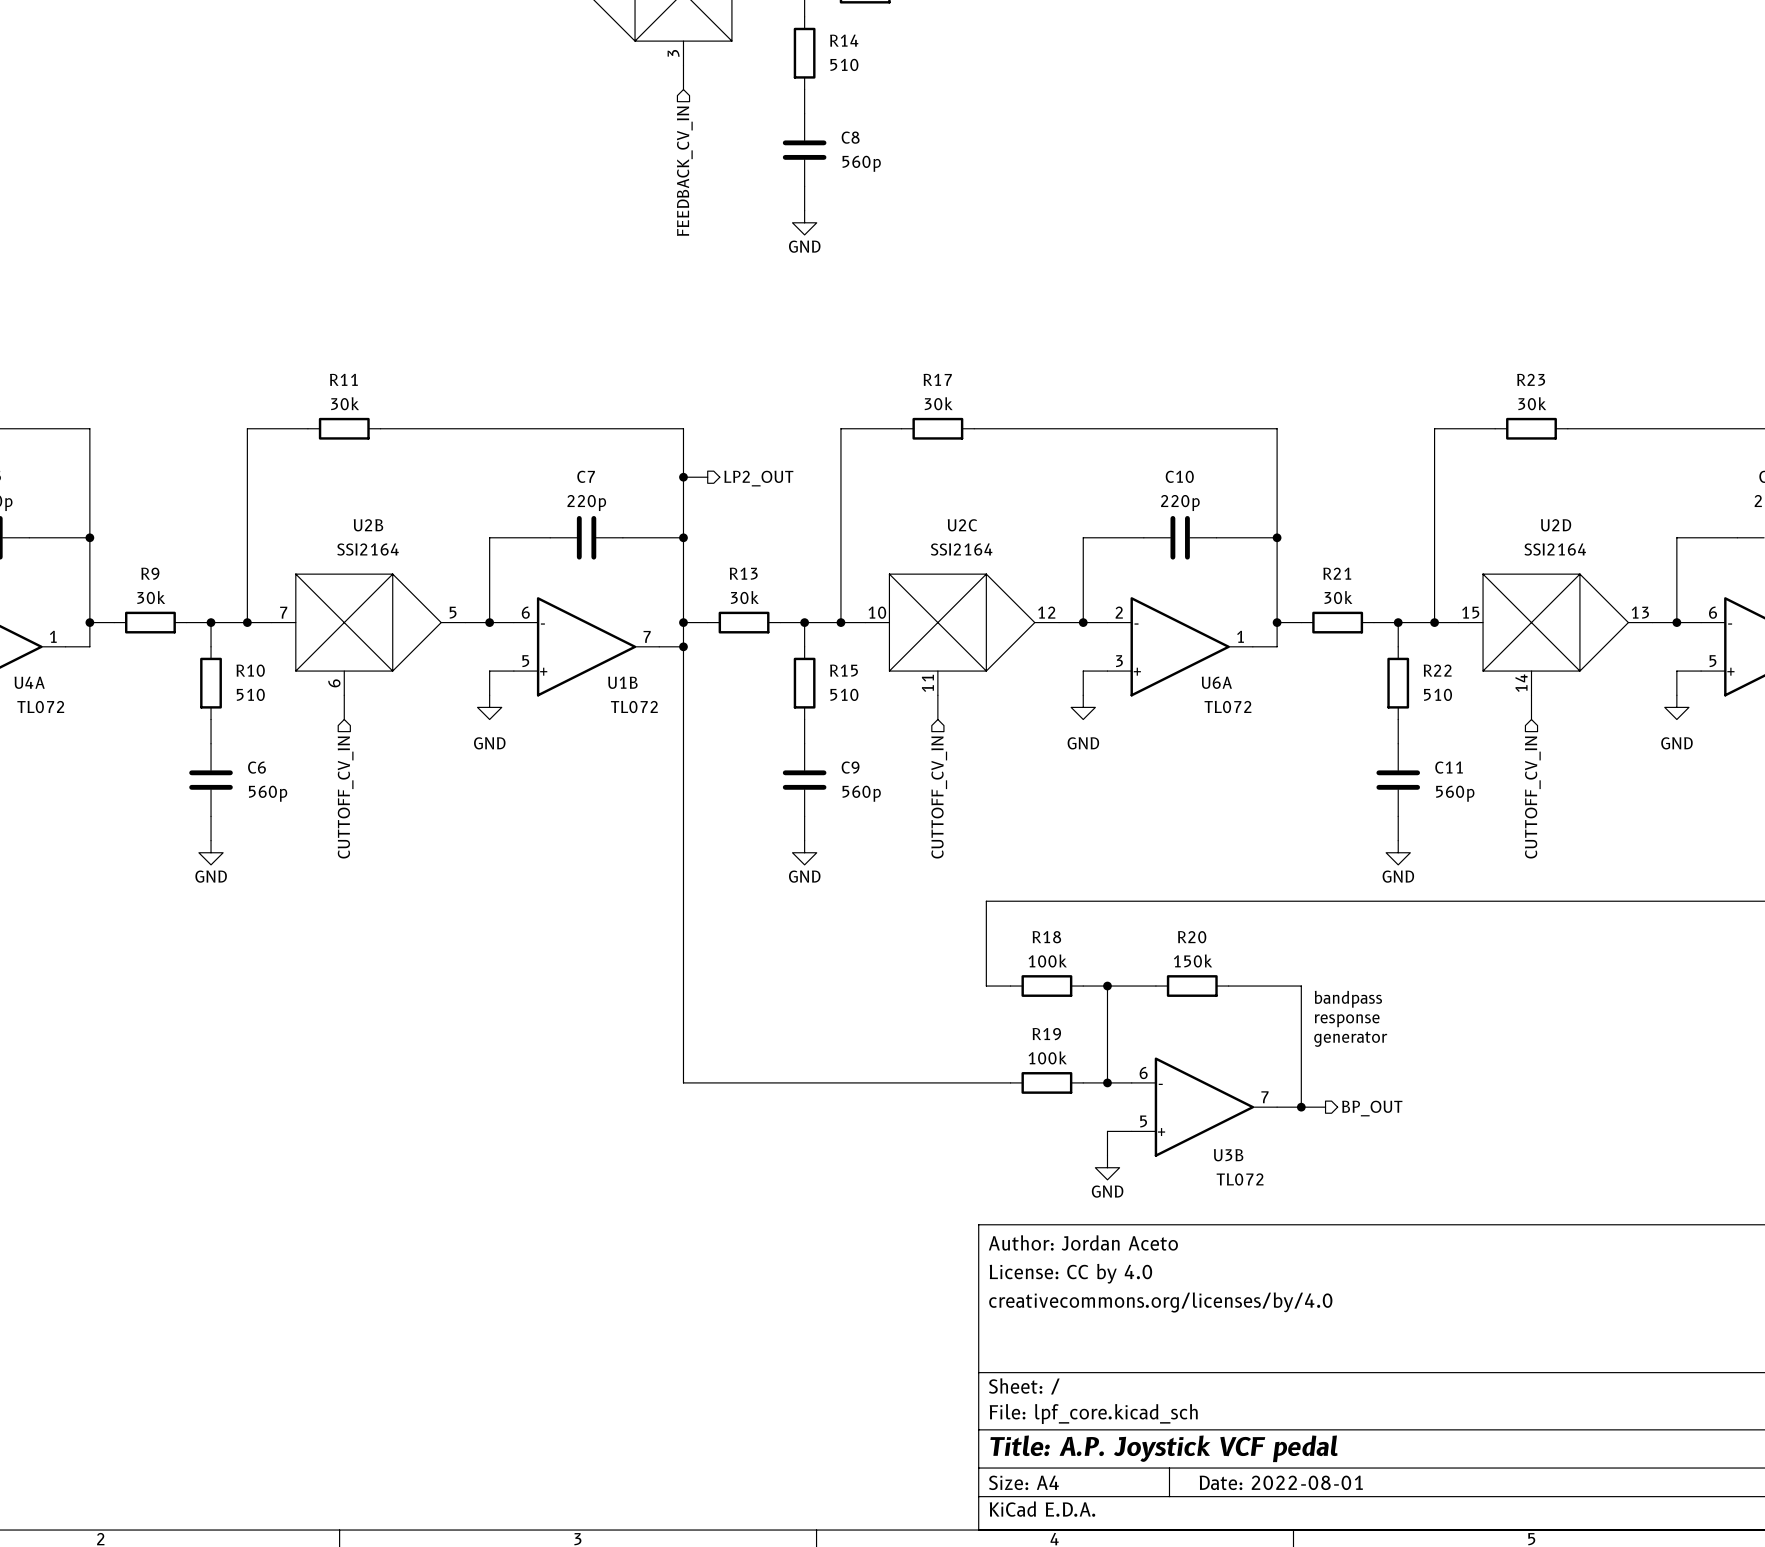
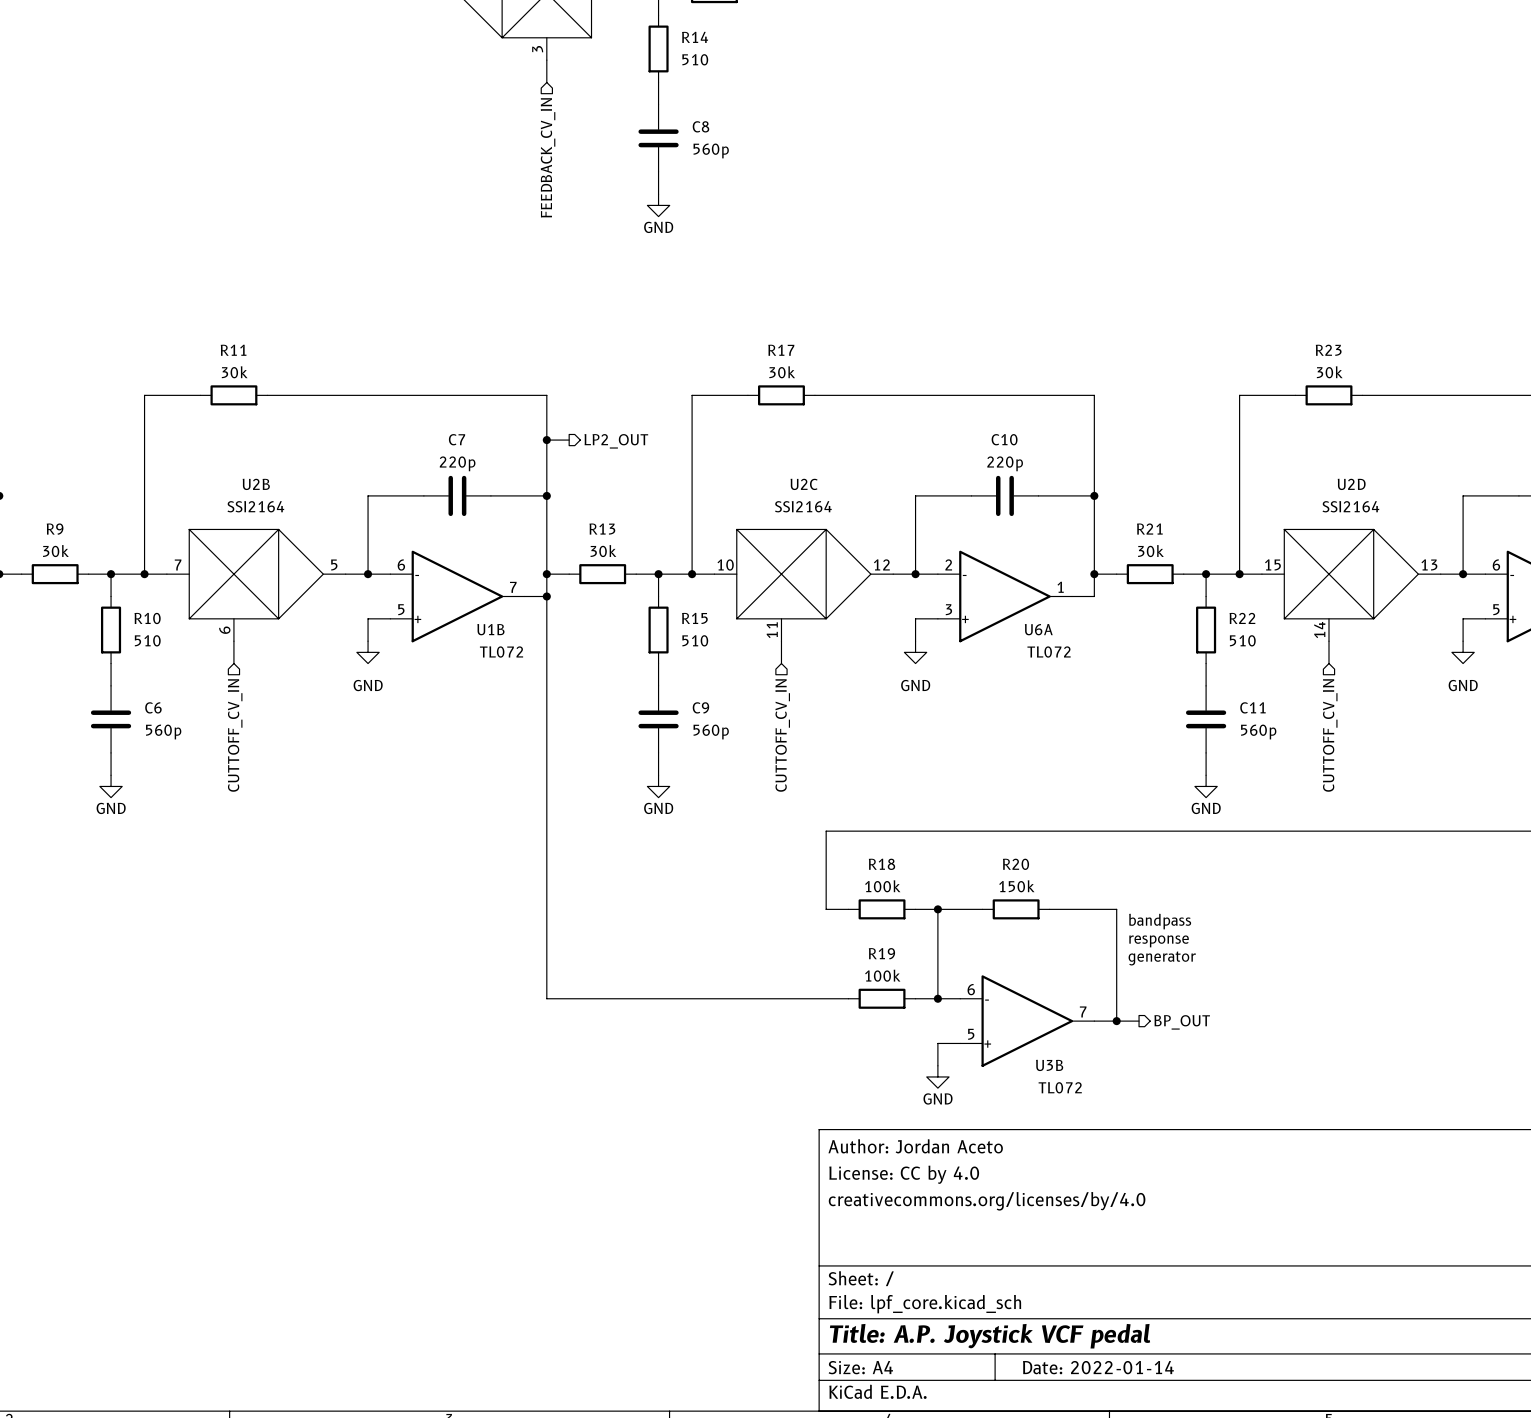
title block: Date: 2022-08-01 (1281, 1482) -> Date: 2022-01-14 (1098, 1367)

